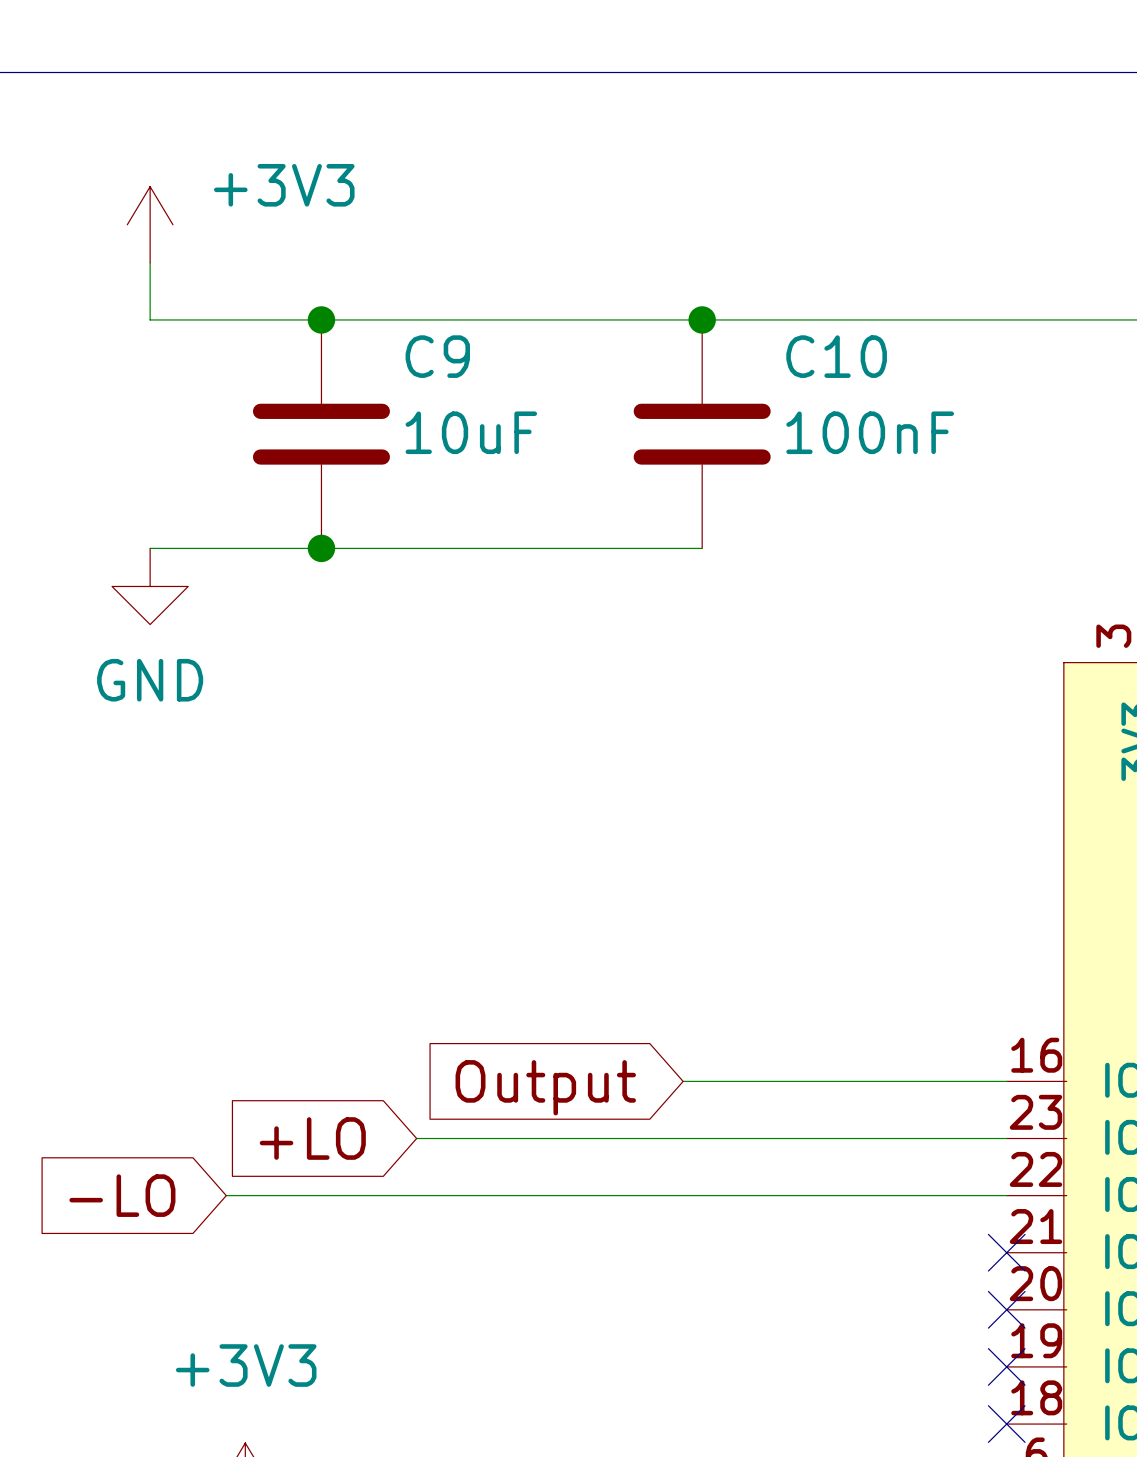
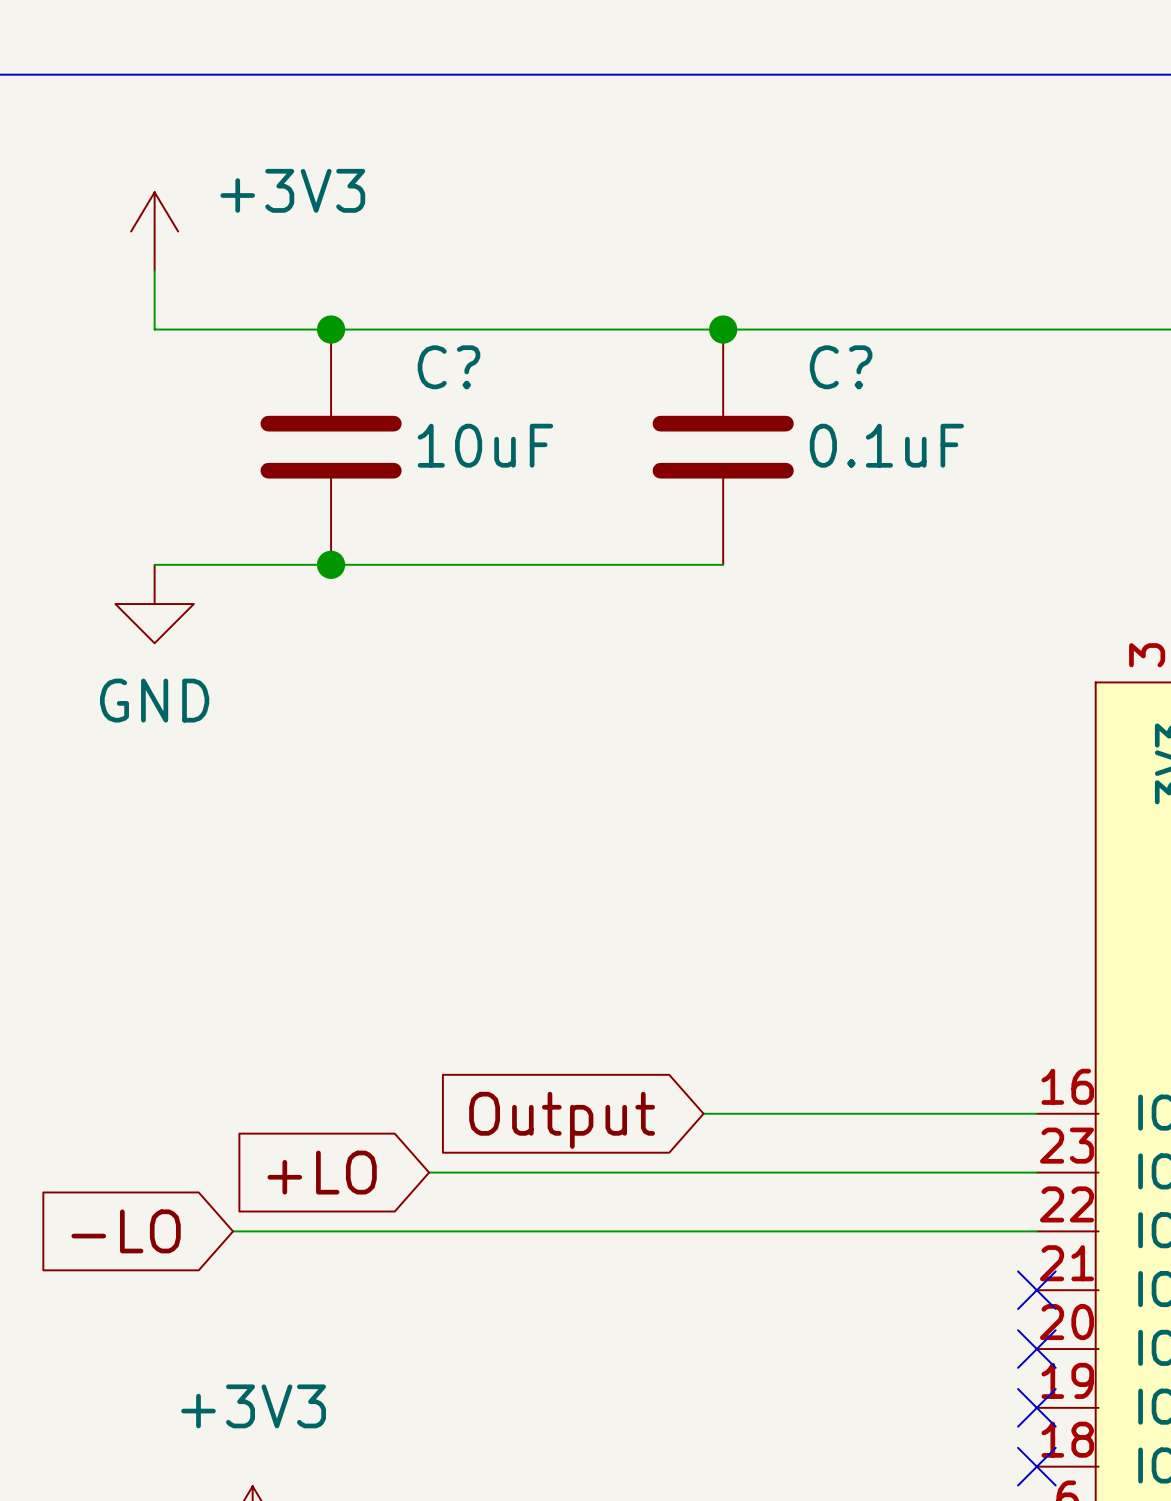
C9 name: C9 (437, 356) -> C? (449, 367)
C10 name: C10 (836, 356) -> C? (841, 367)
C10 value: 100nF (870, 432) -> 0.1uF (886, 445)

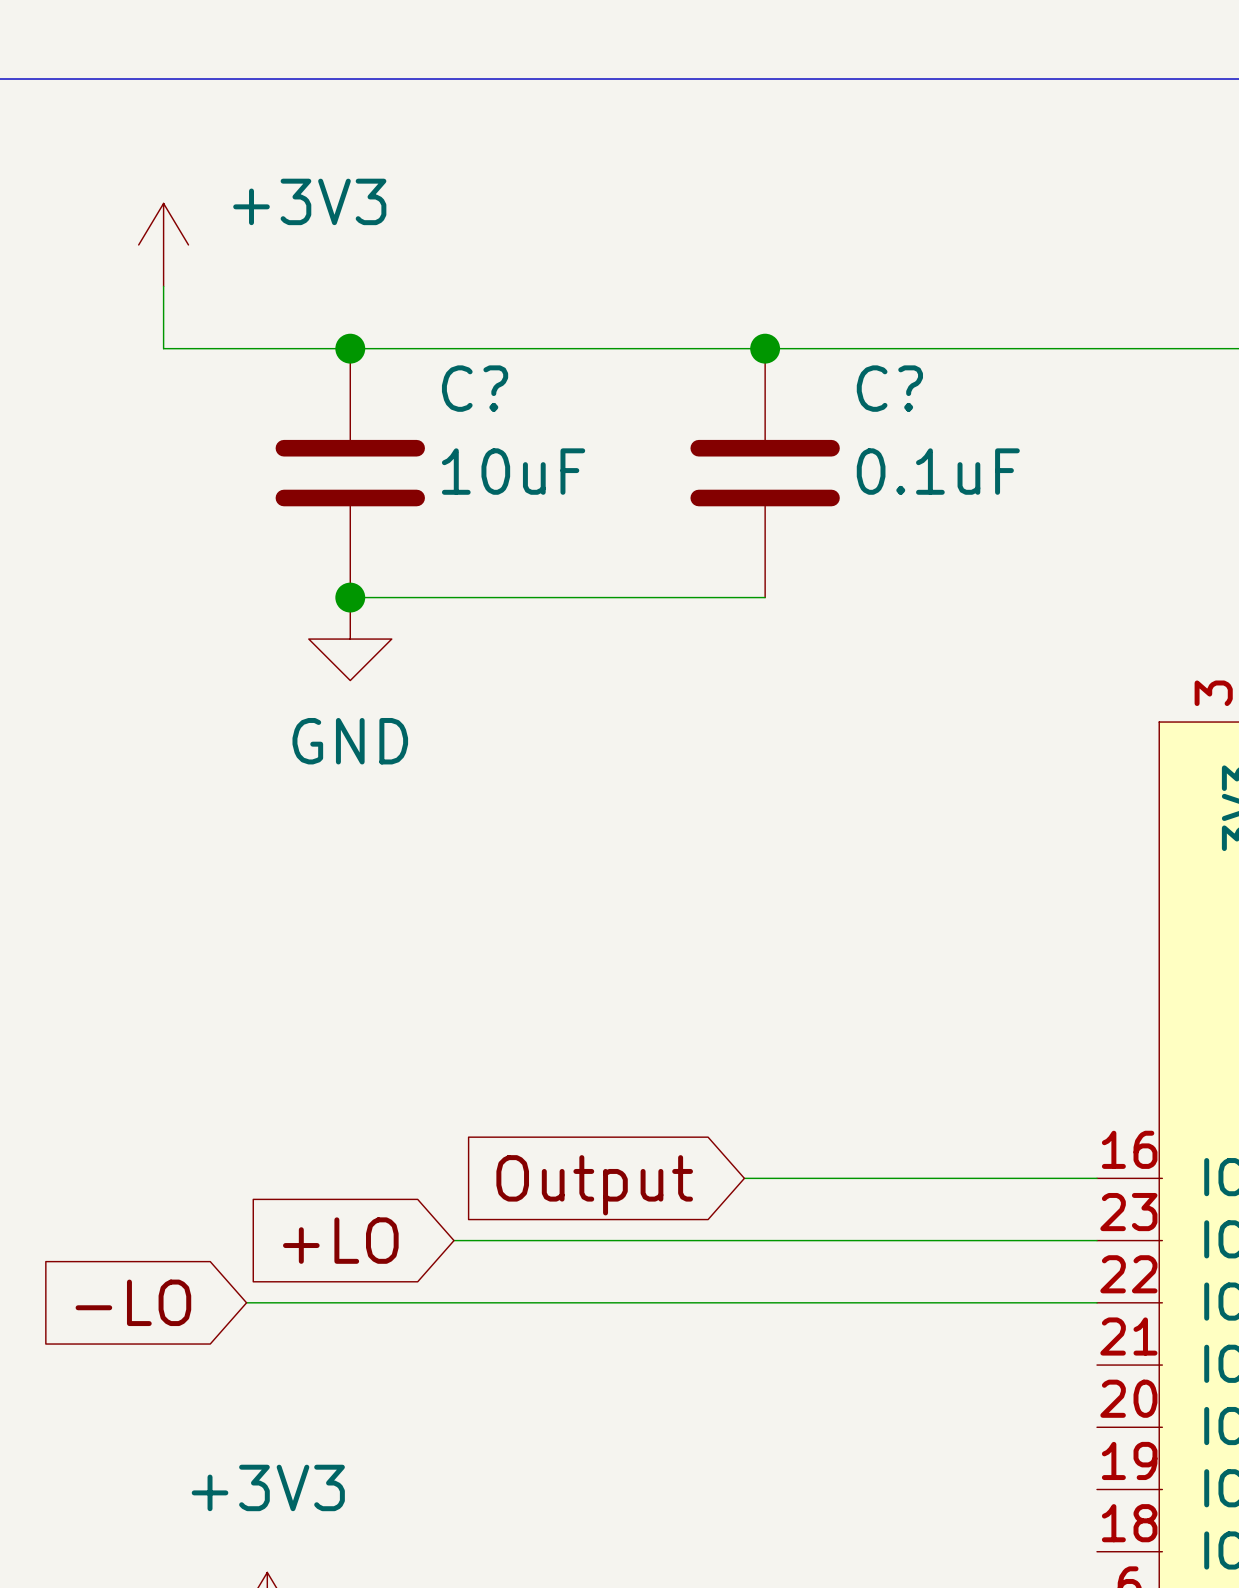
wire: (154, 564) (331, 564) -> none
power symbol position: GND (154, 604) -> GND (350, 639)
no-connect mark: (1036, 1290) -> none
no-connect mark: (1036, 1349) -> none
no-connect mark: (1036, 1407) -> none
no-connect mark: (1036, 1466) -> none

